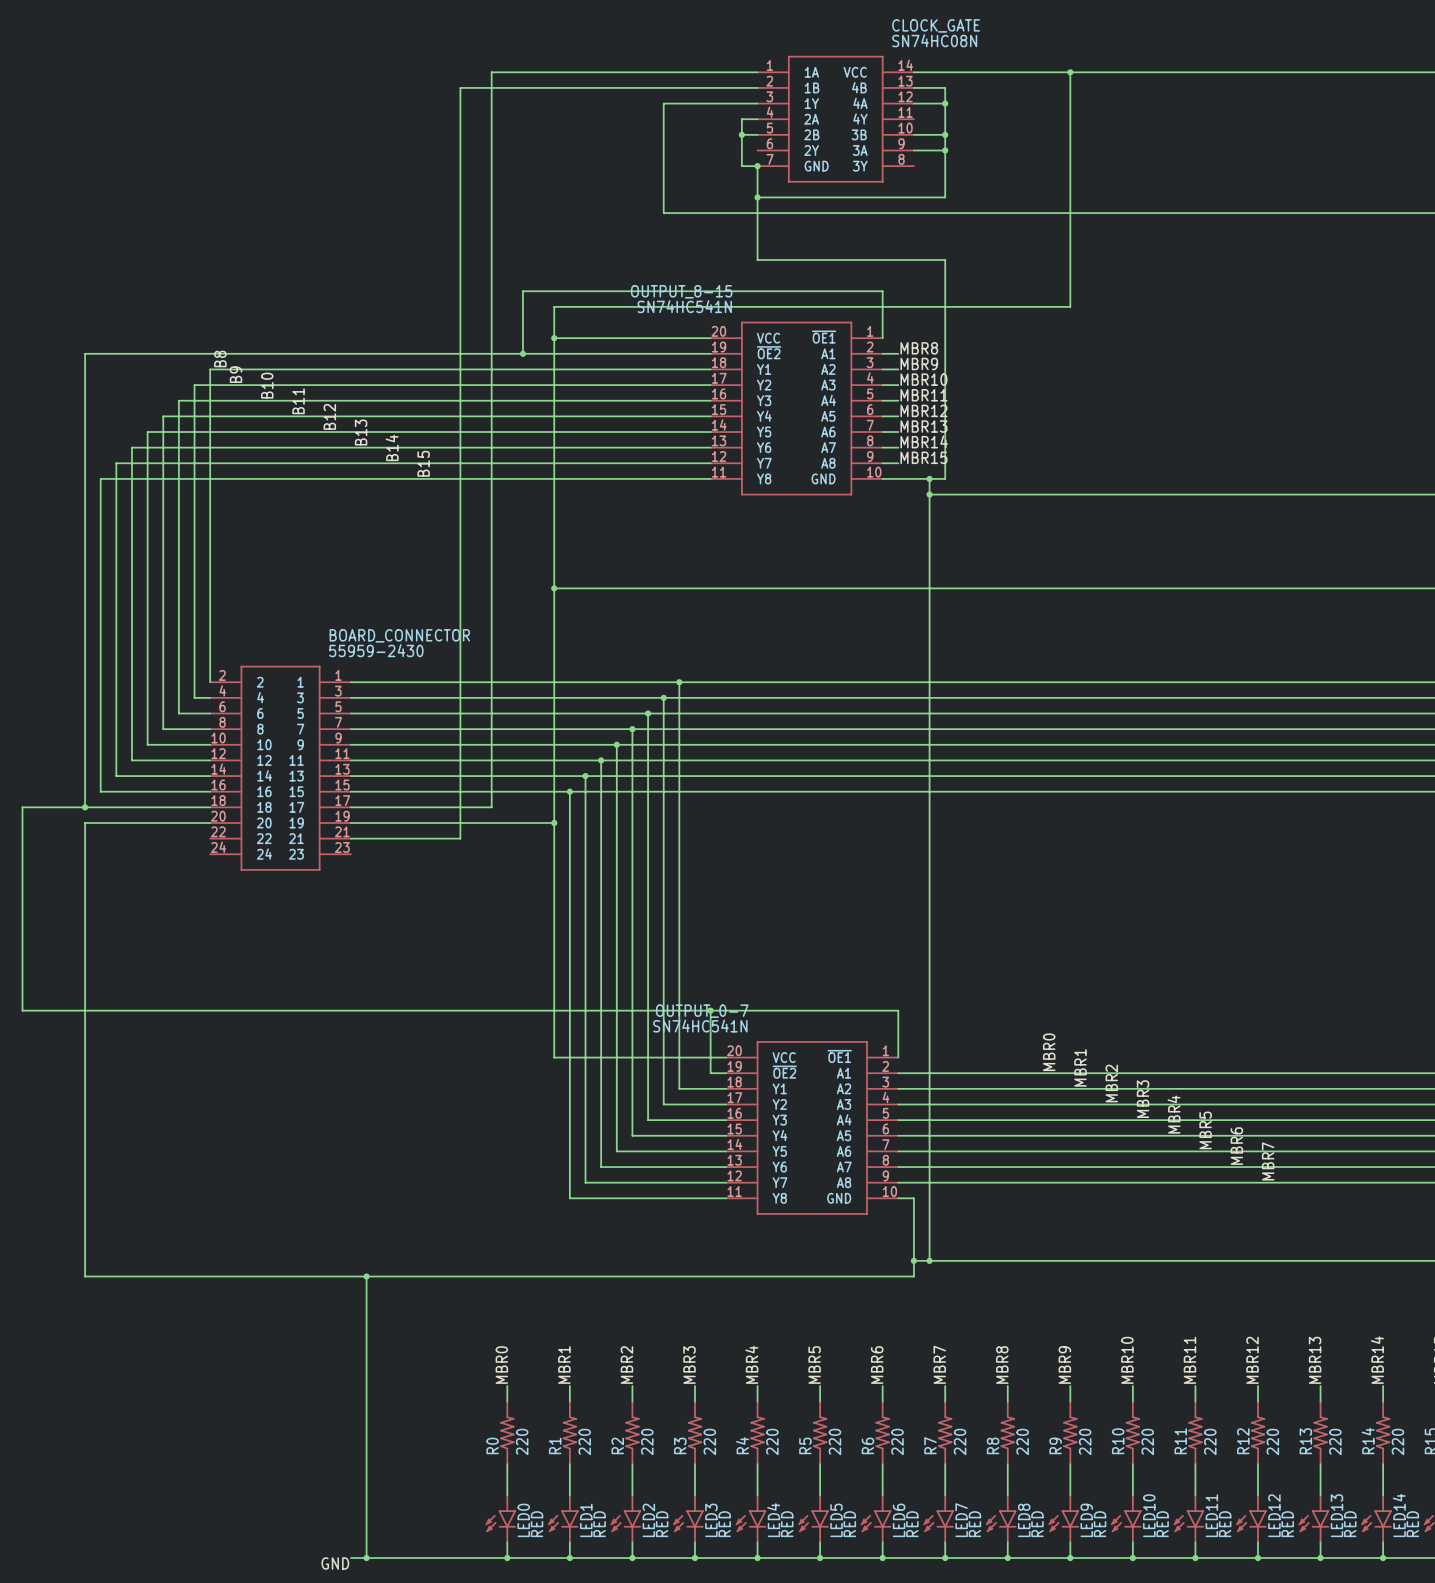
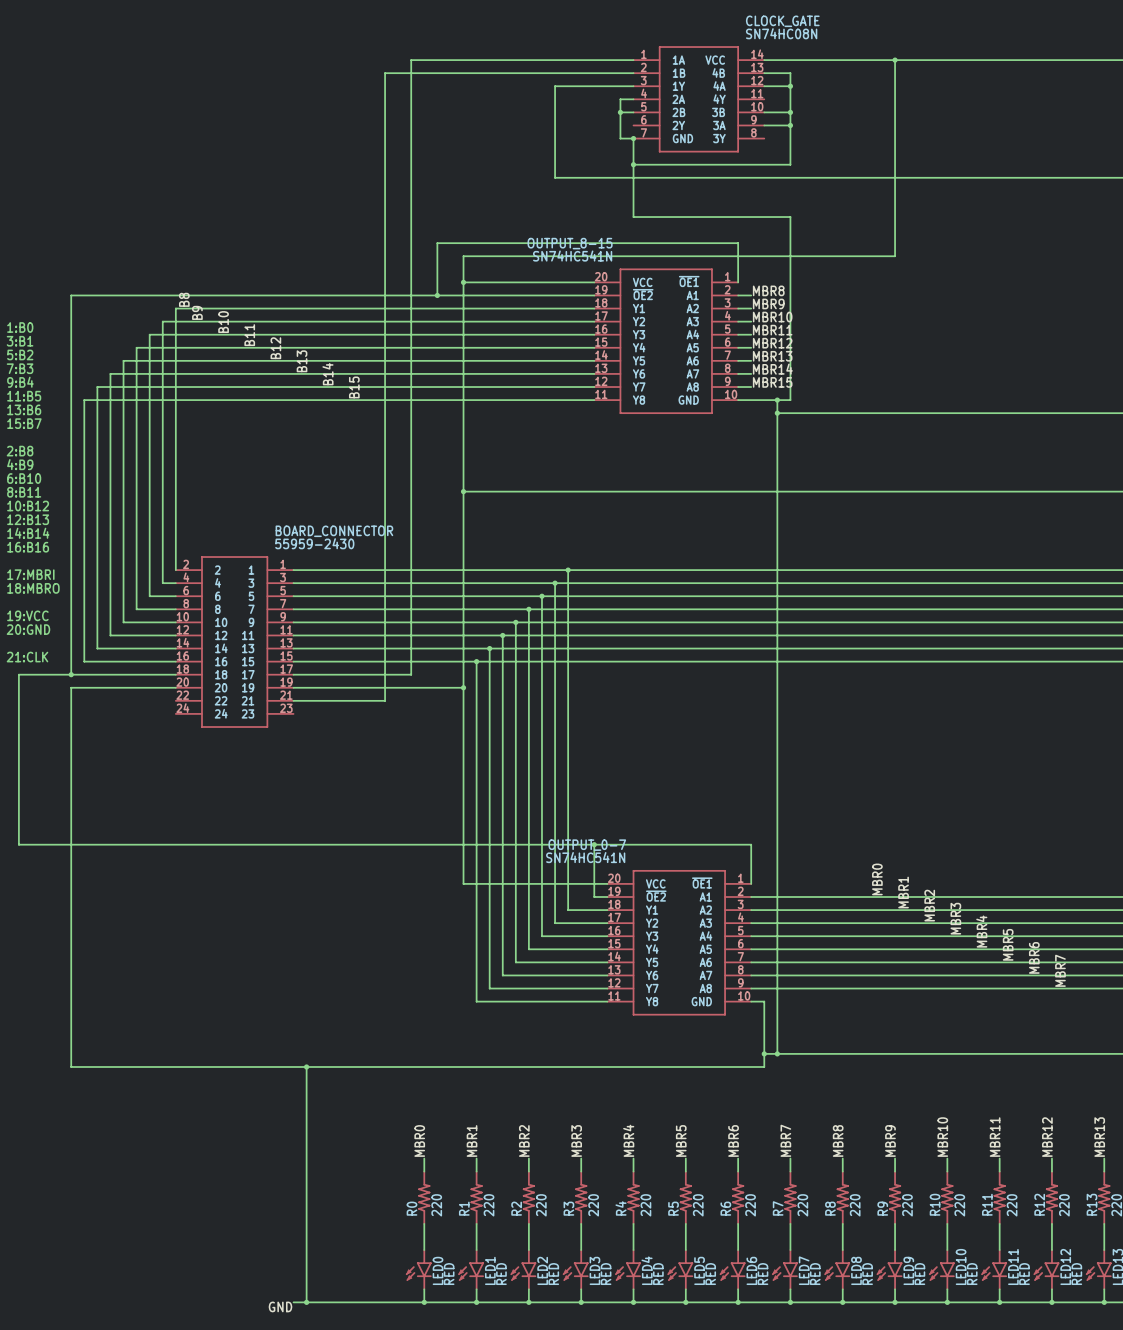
text: none -> 1:B0 (20, 327)
text: none -> 3:B1 (20, 341)
text: none -> 5:B2 (20, 354)
text: none -> 7:B3 (20, 368)
text: none -> 9:B4 (20, 382)
text: none -> 11:B5 (24, 396)
text: none -> 13:B6 (24, 409)
text: none -> 15:B7 (24, 423)
text: none -> 2:B8 (20, 451)
text: none -> 4:B9 (20, 464)
text: none -> 6:B10 (24, 478)
text: none -> 8:B11 (24, 492)
text: none -> 10:B12 (28, 506)
text: none -> 12:B13 (28, 519)
text: none -> 14:B14 (28, 533)
text: none -> 16:B16 (28, 547)
text: none -> 17:MBRI (30, 574)
text: none -> 18:MBRO (33, 588)
text: none -> 19:VCC (27, 615)
text: none -> 20:GND (28, 629)
text: none -> 21:CLK (27, 657)

